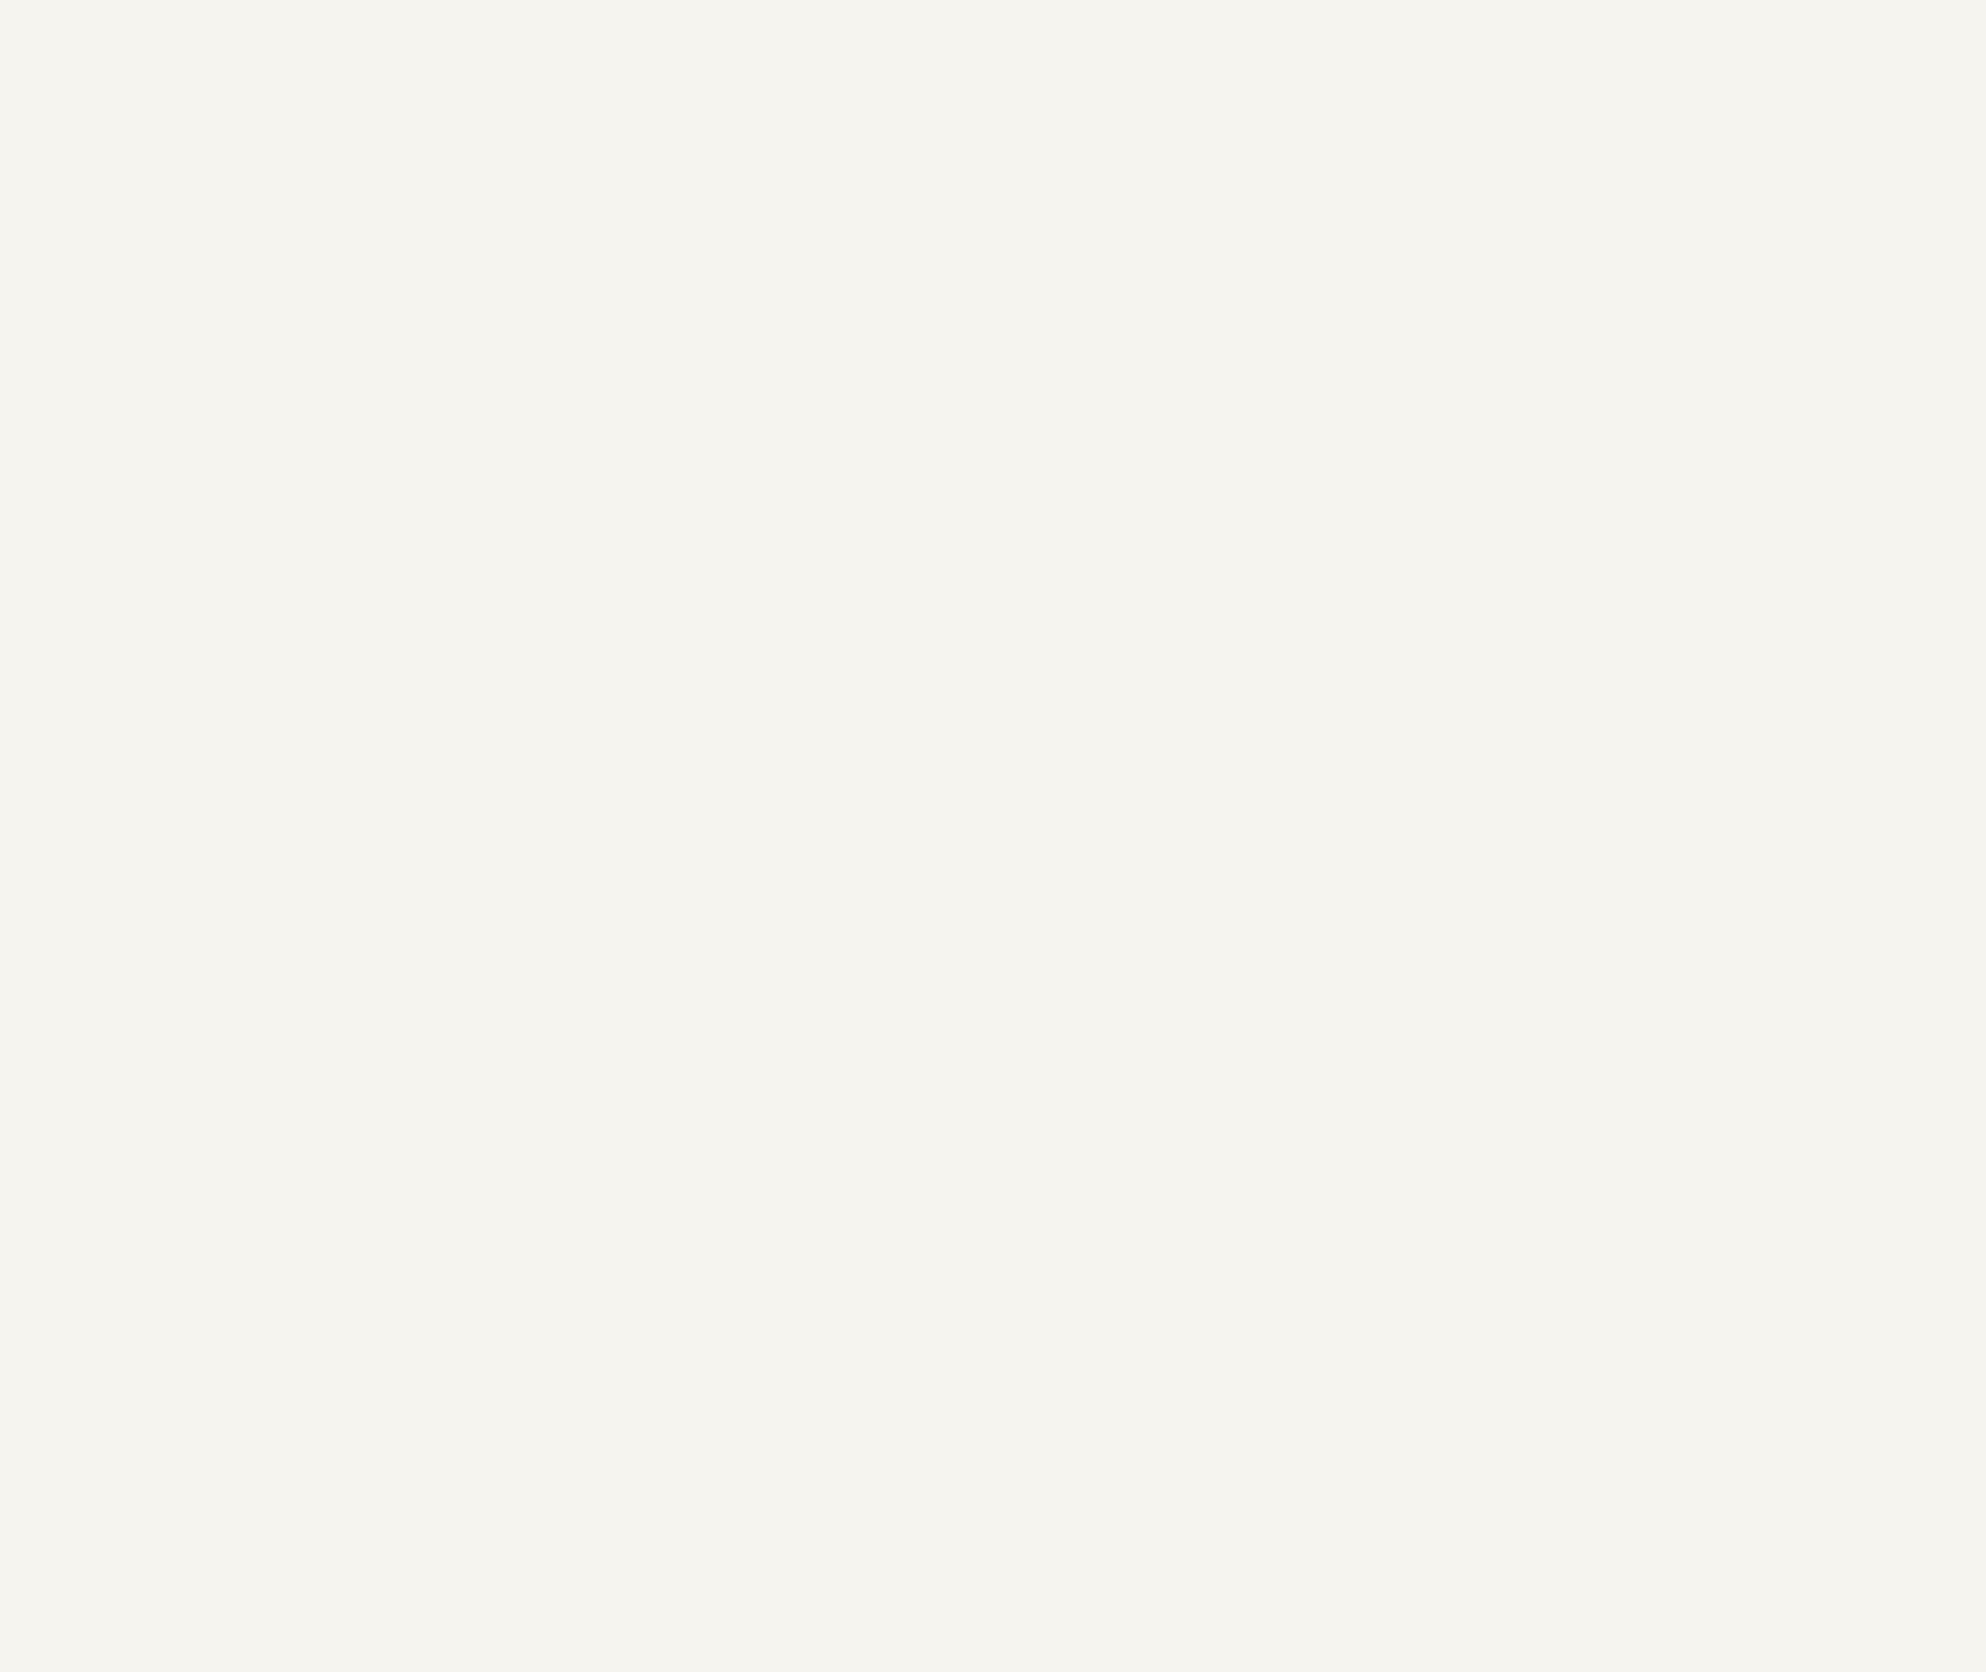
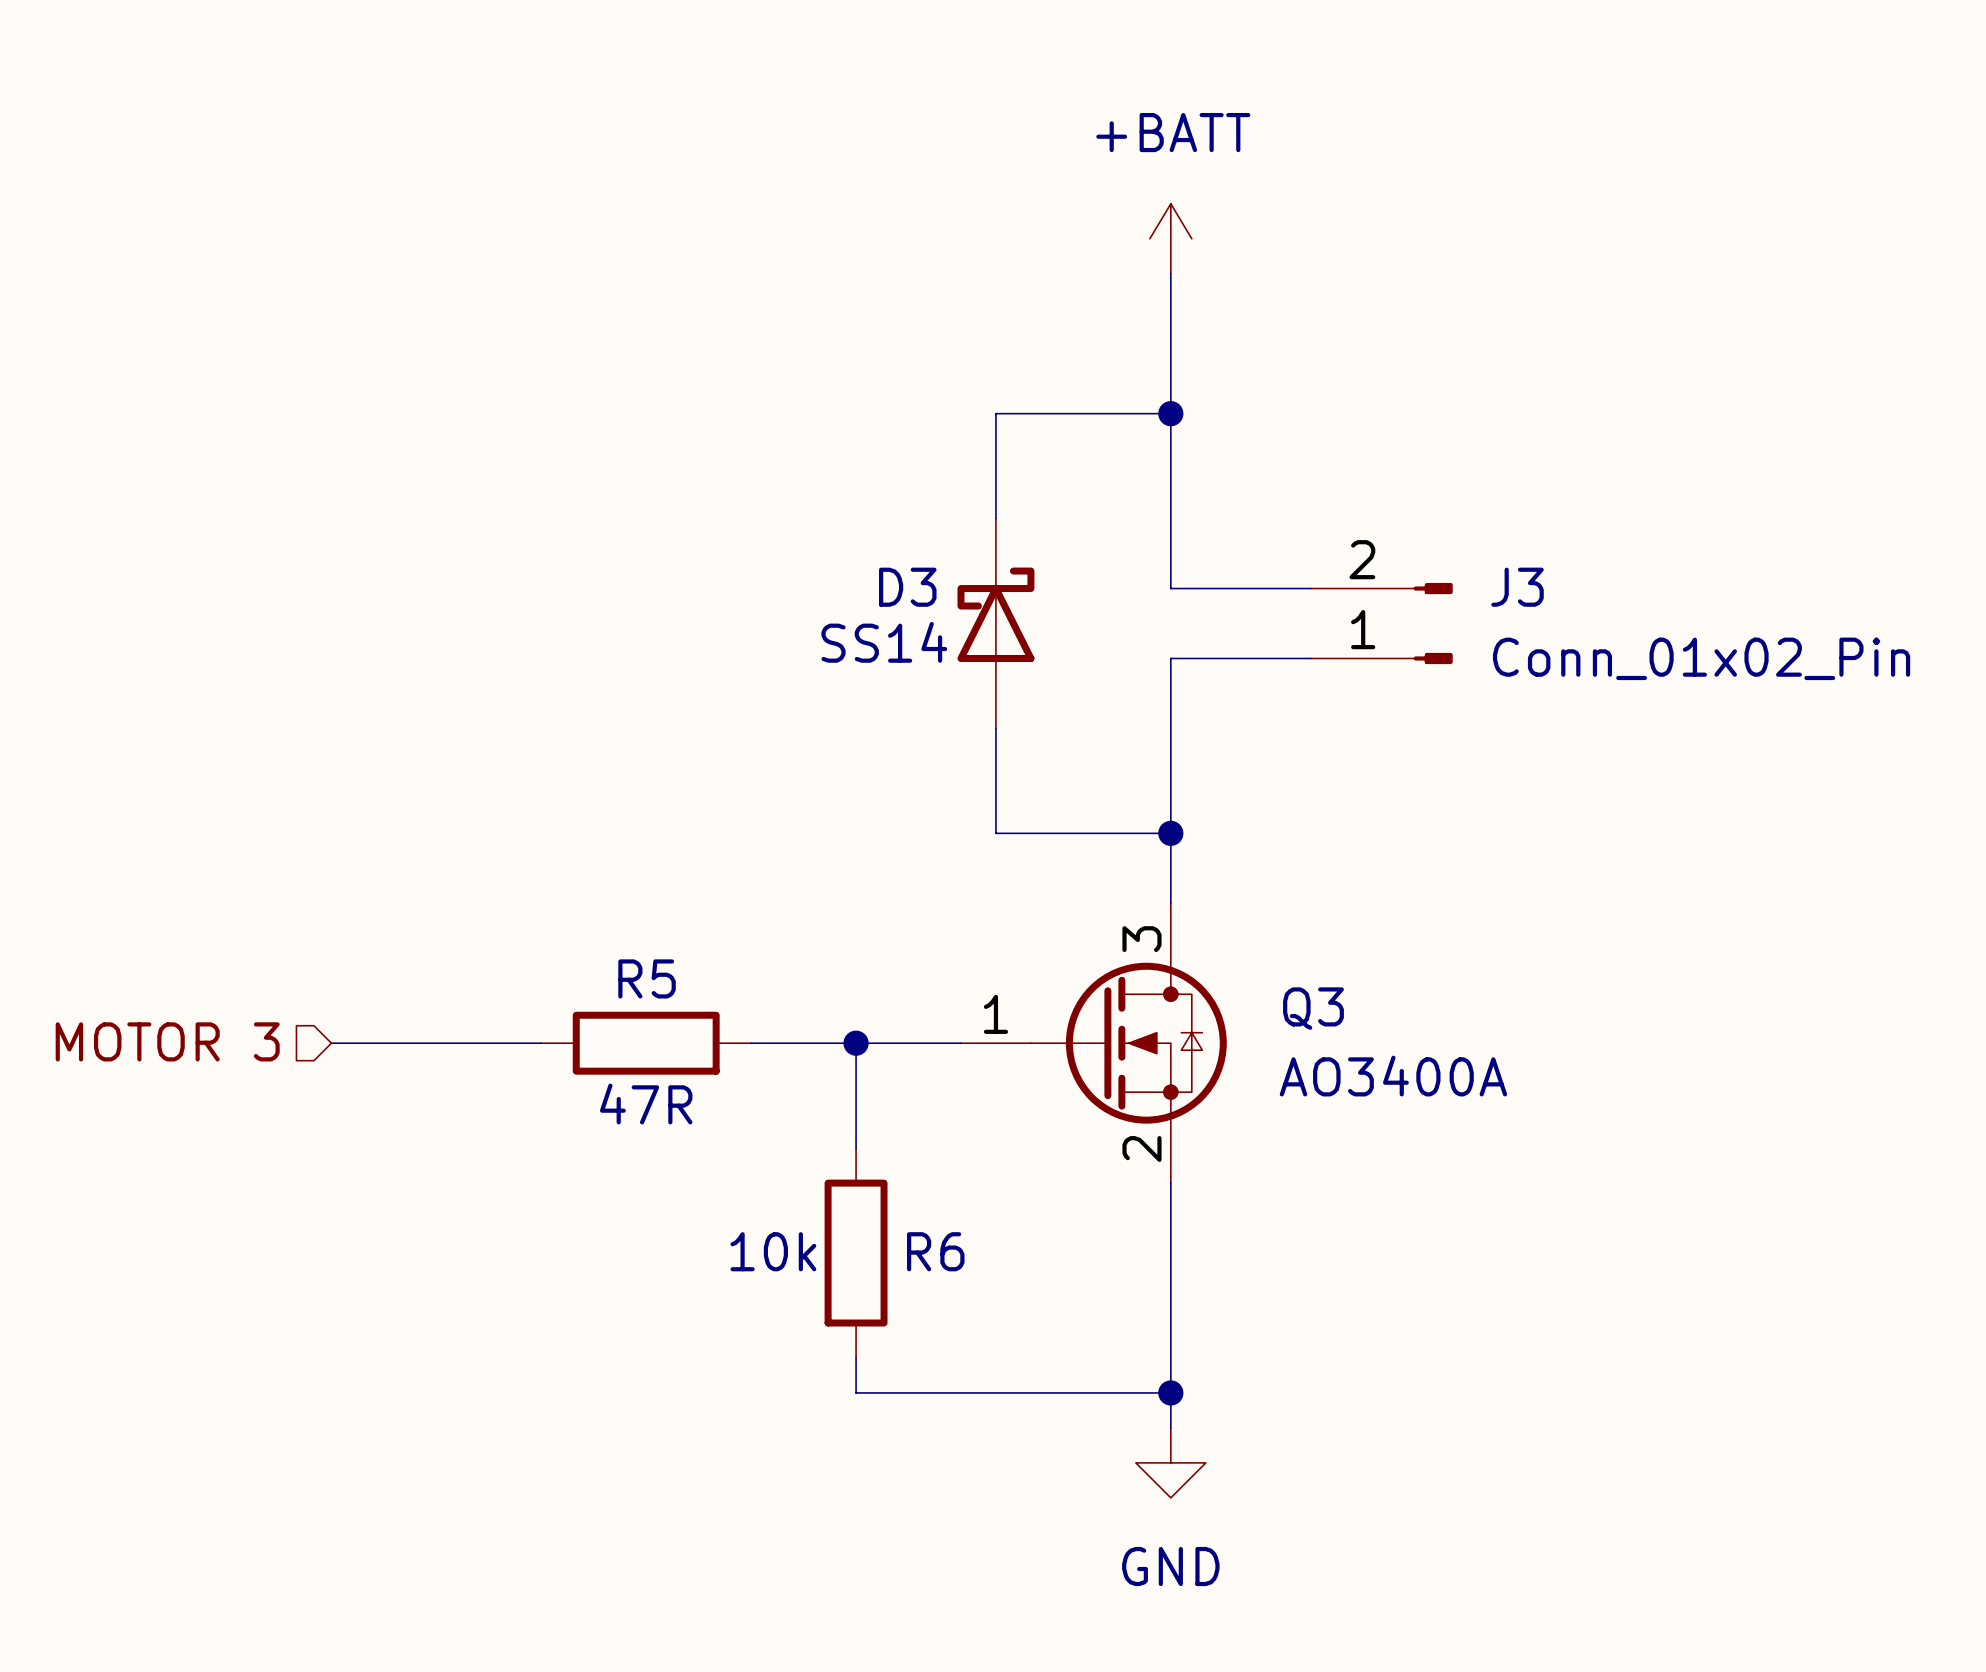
power symbol: none -> +BATT (1170, 238)
wire: none -> (1170, 273) (1170, 588) (1310, 588)
wire: none -> (1170, 413) (995, 413) (995, 518)
junction: none -> (1170, 413)
D3: none -> SS14 (995, 623)
J3: none -> Conn_01x02_Pin (1381, 623)
wire: none -> (1310, 658) (1170, 658) (1170, 903)
wire: none -> (995, 728) (995, 833) (1170, 833)
junction: none -> (1170, 833)
hierarchical label: none -> MOTOR 3 (167, 1041)
wire: none -> (331, 1043) (541, 1043)
R5: none -> 47R (646, 1043)
wire: none -> (751, 1043) (960, 1043)
wire: none -> (856, 1043) (856, 1148)
junction: none -> (856, 1043)
Q3: none -> AO3400A (1093, 1043)
wire: none -> (1170, 1183) (1170, 1427)
R6: none -> 10k (856, 1253)
wire: none -> (856, 1357) (856, 1392) (1170, 1392)
junction: none -> (1170, 1392)
power symbol: none -> GND (1170, 1462)

